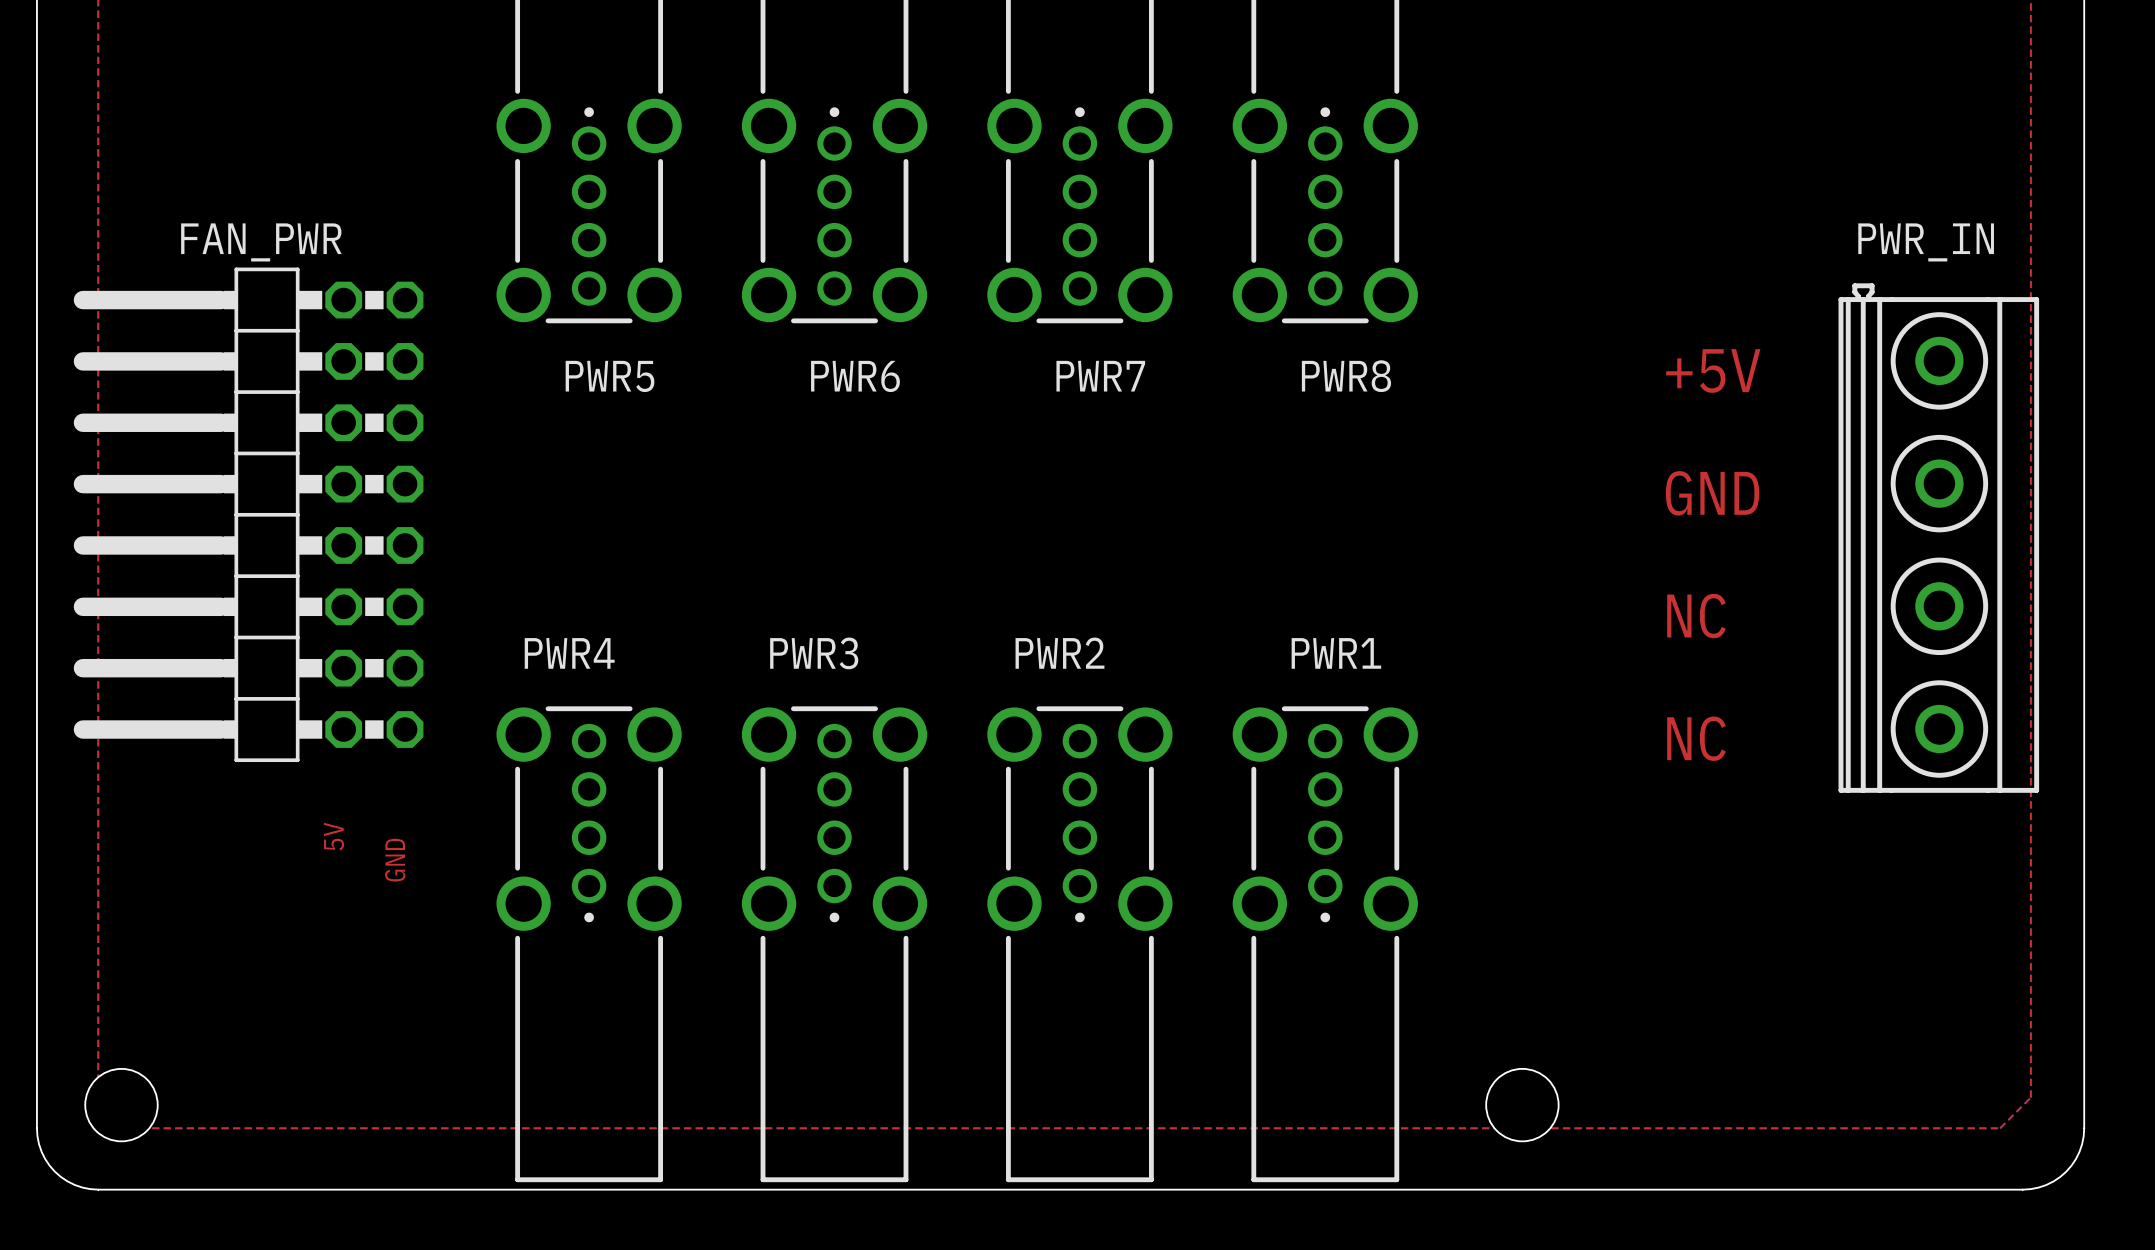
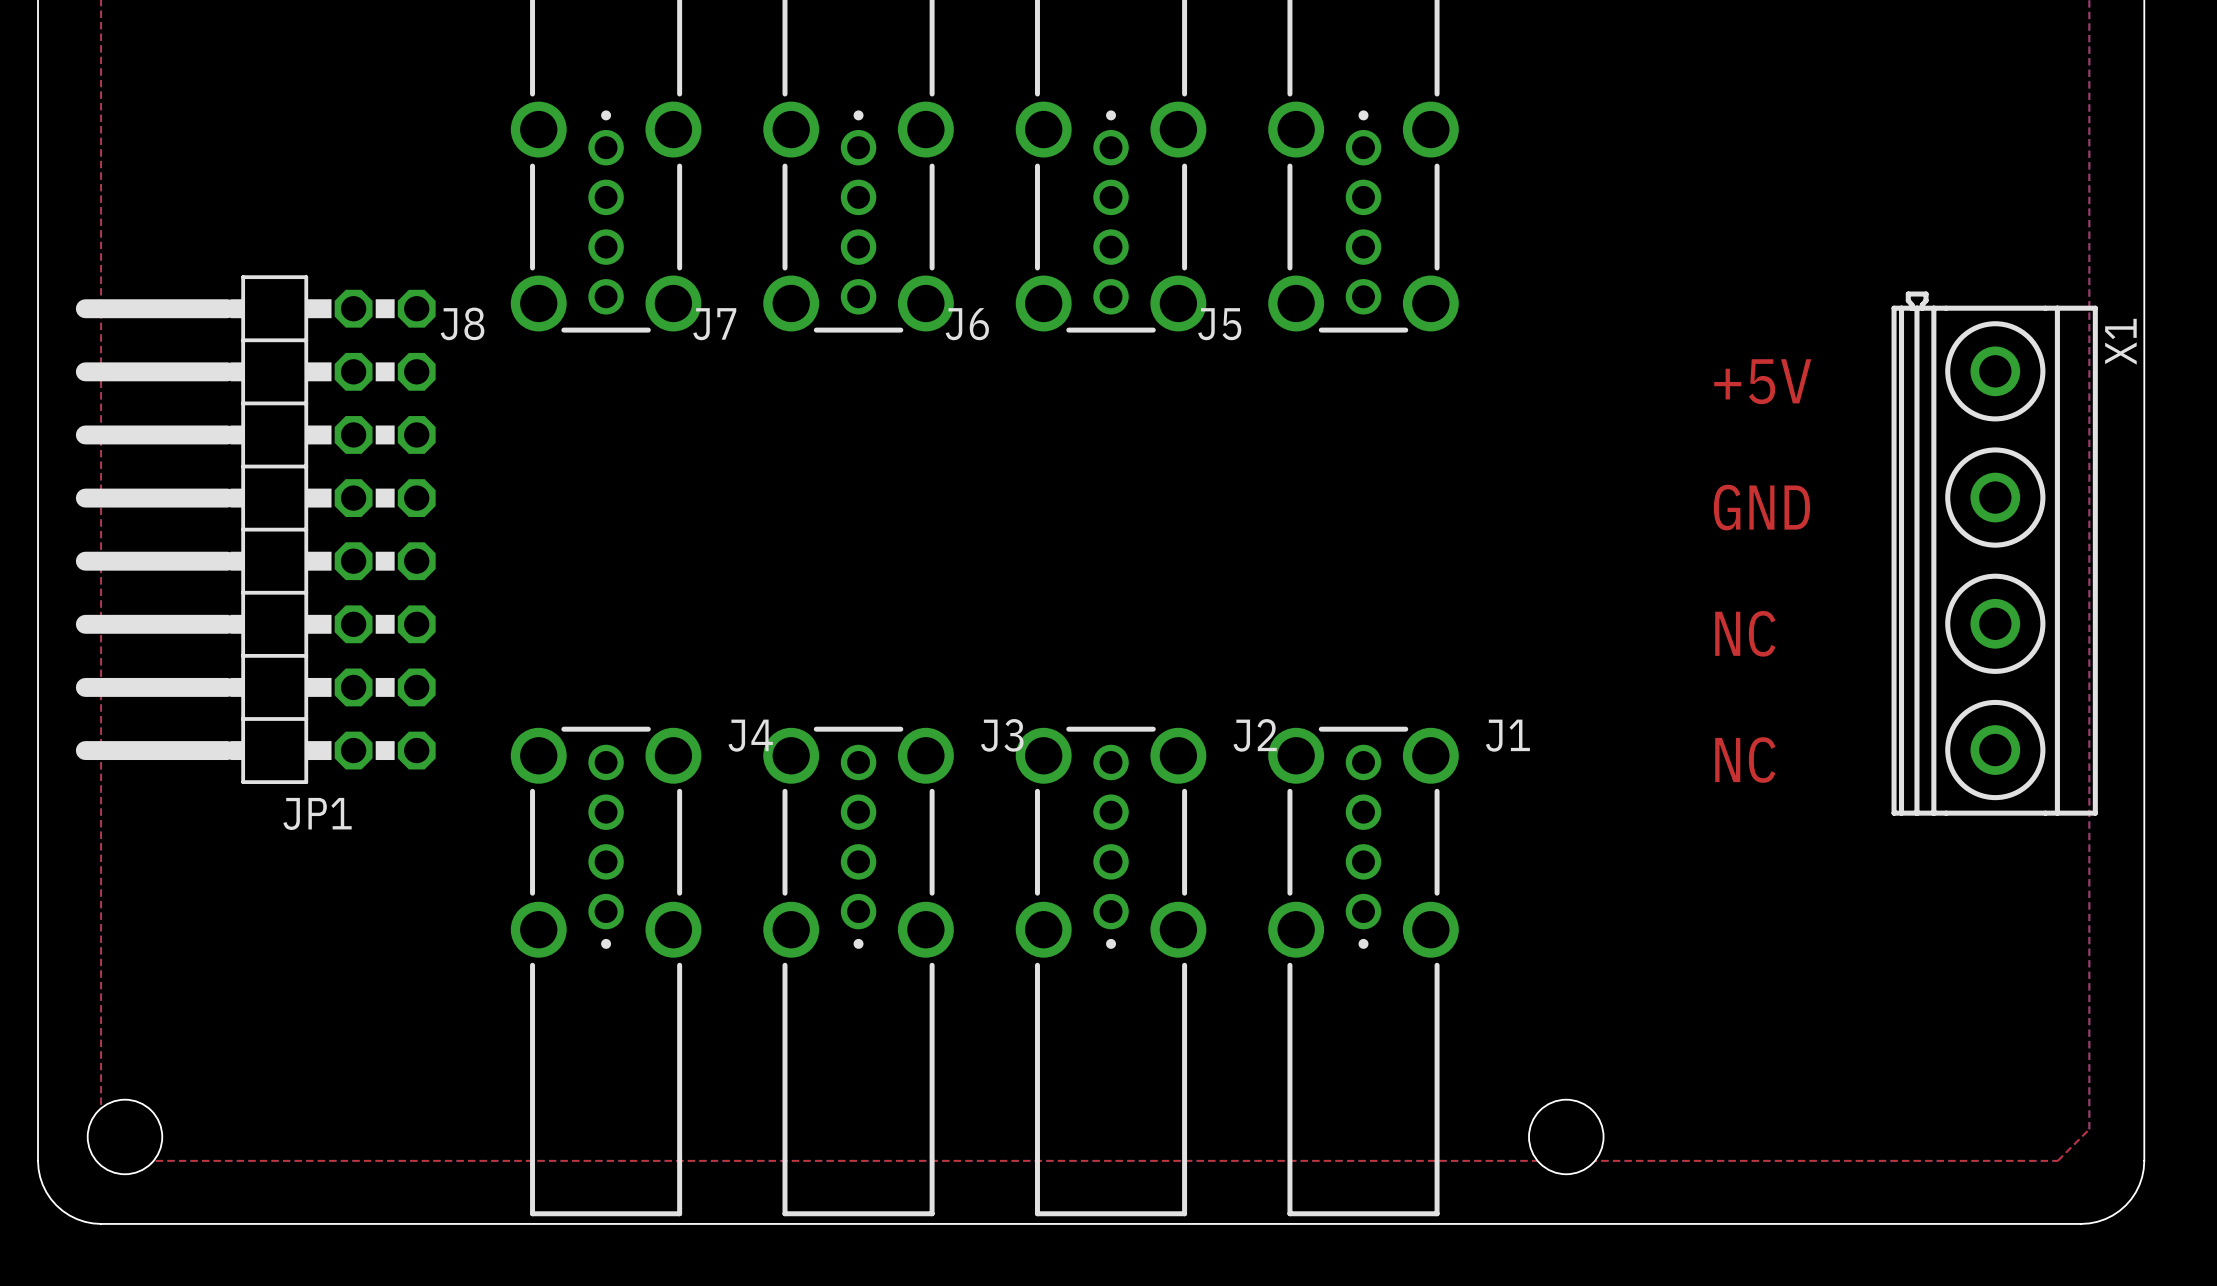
FAN_PWR name: FAN_PWR (261, 242) -> JP1 (317, 813)
PWR_IN name: PWR_IN (1926, 242) -> X1 (2120, 341)
PWR5 name: PWR5 (610, 376) -> J8 (462, 323)
PWR6 name: PWR6 (855, 376) -> J7 (714, 324)
PWR7 name: PWR7 (1100, 376) -> J6 (967, 324)
PWR8 name: PWR8 (1346, 376) -> J5 (1219, 324)
PWR4 name: PWR4 (569, 653) -> J4 (750, 735)
PWR3 name: PWR3 (814, 653) -> J3 (1002, 735)
PWR2 name: PWR2 (1059, 653) -> J2 (1255, 735)
PWR1 name: PWR1 (1336, 653) -> J1 (1507, 735)
text: 5V (334, 836) -> none
text: GND (395, 860) -> none

